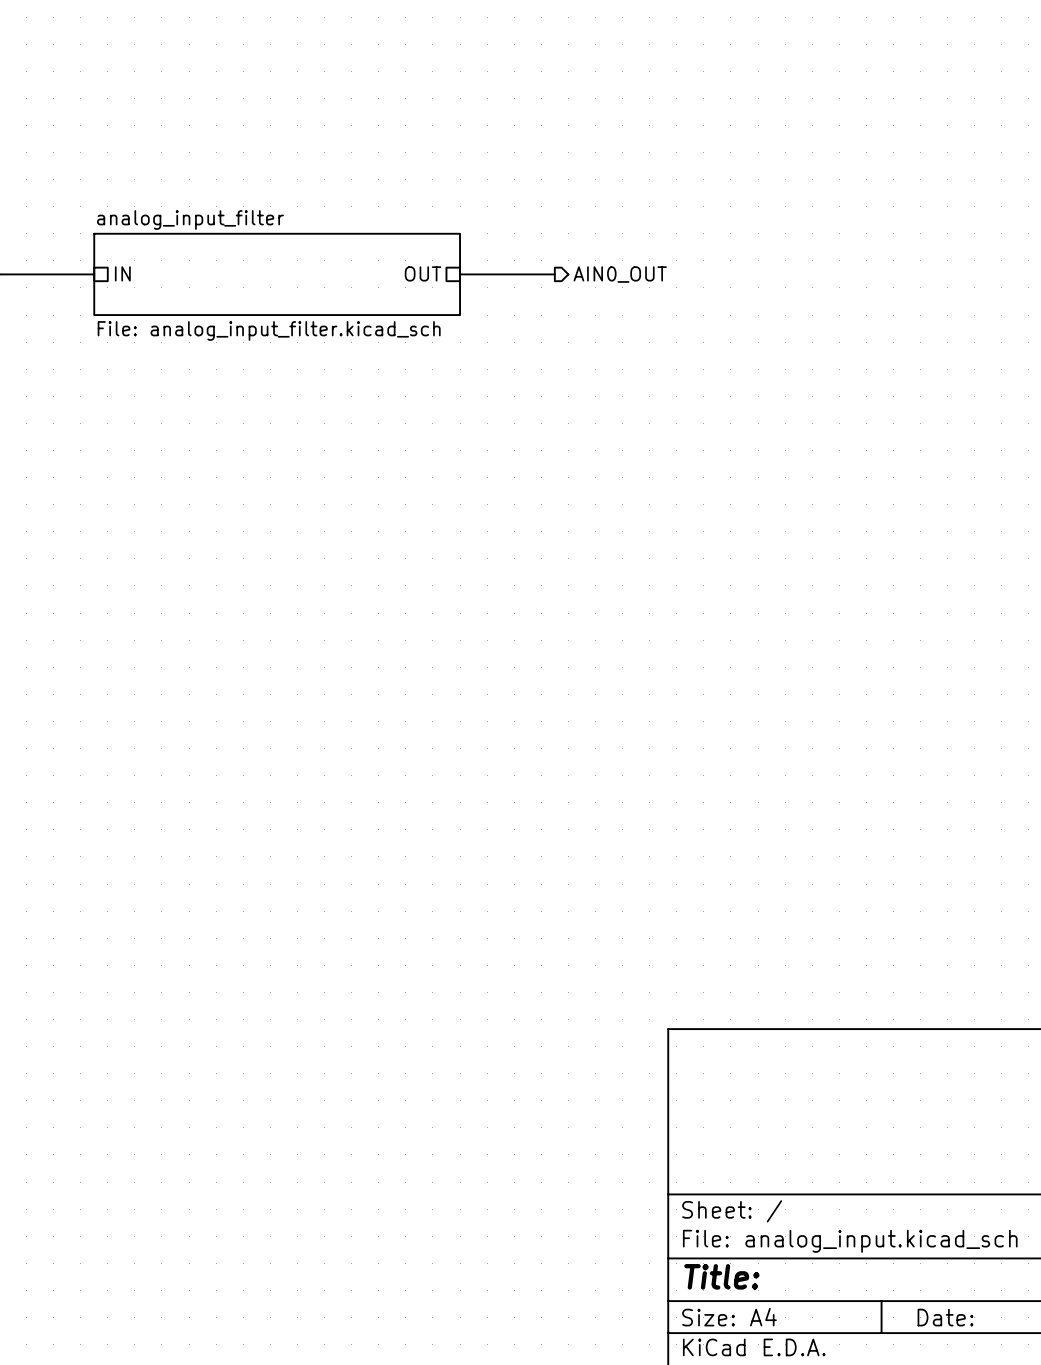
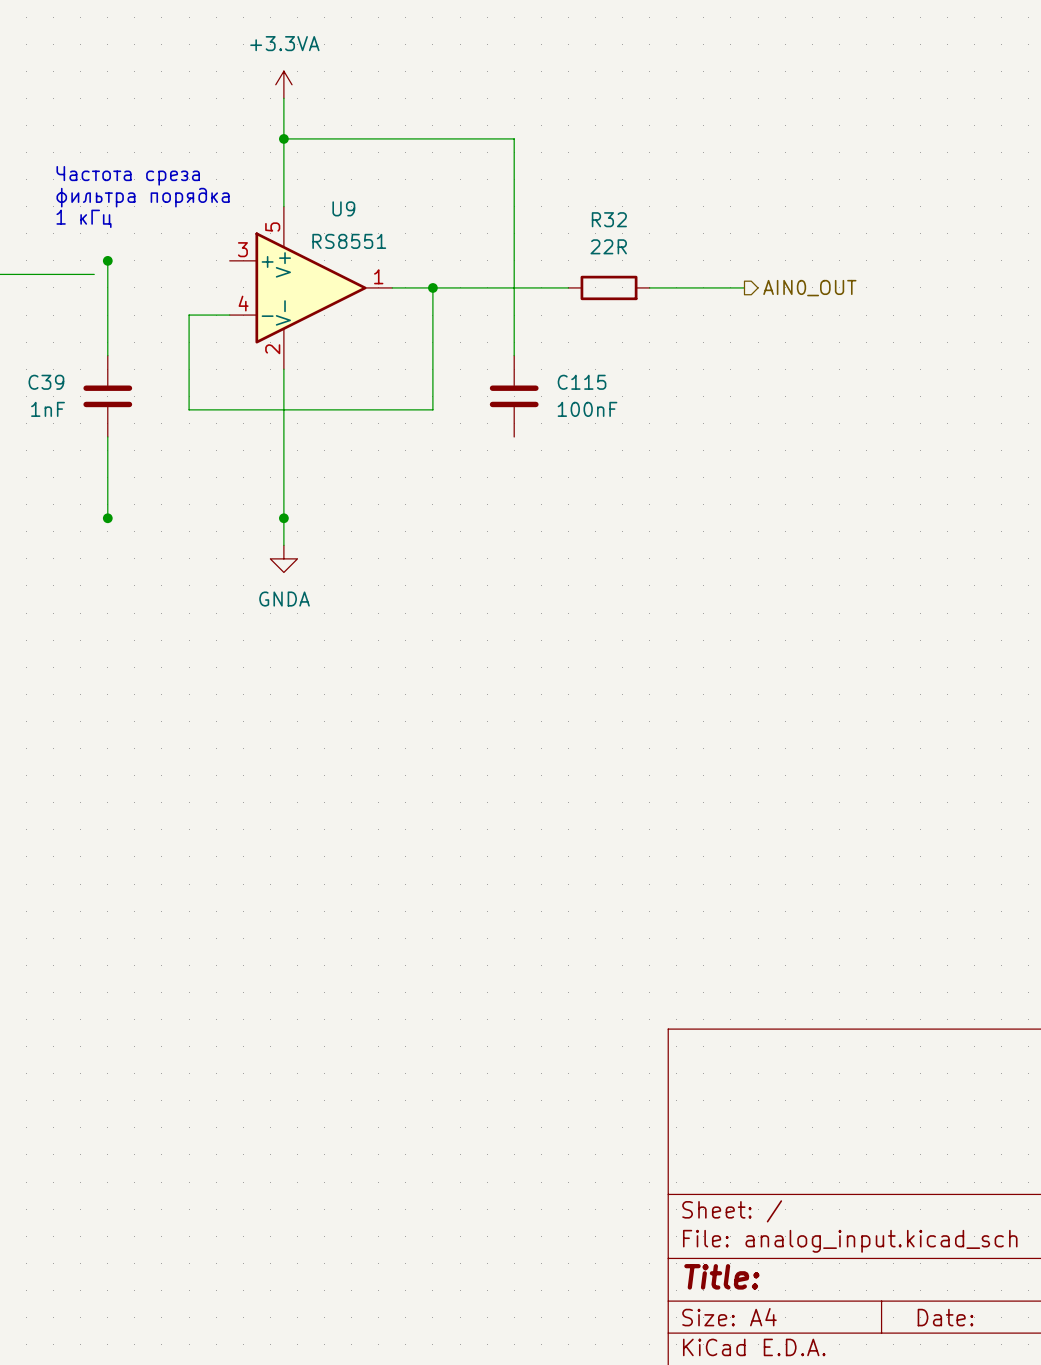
power symbol: none -> +3.3VA (283, 84)
wire: none -> (283, 98) (283, 206)
wire: none -> (283, 138) (514, 138) (514, 355)
junction: none -> (283, 138)
text: none -> Частота среза (128, 175)
text: none -> фильтра порядка (143, 197)
text: none -> 1 кГц (84, 218)
wire: none -> (107, 260) (107, 355)
junction: none -> (107, 260)
sheet pin: IN (122, 273) -> none
sheet pin: OUT (423, 273) -> none
sheet analog_input_filter: File: analog_input_filter.kicad_sch (277, 274) -> none
wire: (460, 274) (554, 274) -> (649, 287) (744, 287)
hierarchical label position: AIN0_OUT (620, 274) -> AIN0_OUT (809, 288)
U9: none -> RS8551 (310, 287)
wire: none -> (392, 287) (568, 287)
wire: none -> (432, 287) (432, 409) (189, 409) (189, 315) (229, 315)
junction: none -> (432, 287)
R32: none -> 22R (609, 287)
wire: none -> (283, 369) (283, 545)
C39: none -> 1nF (107, 396)
C115: none -> 100nF (514, 396)
wire: none -> (107, 436) (107, 518)
junction: none -> (107, 518)
junction: none -> (283, 518)
power symbol: none -> GNDA (283, 558)

